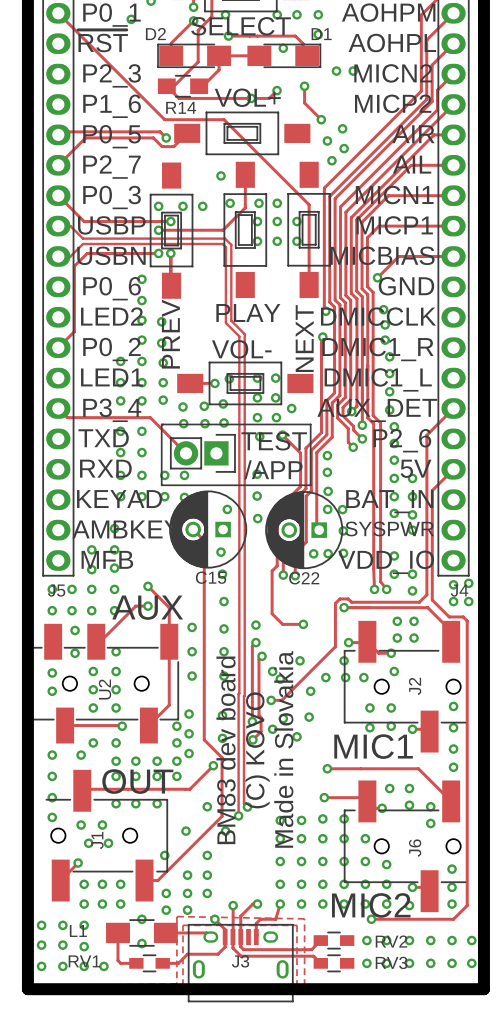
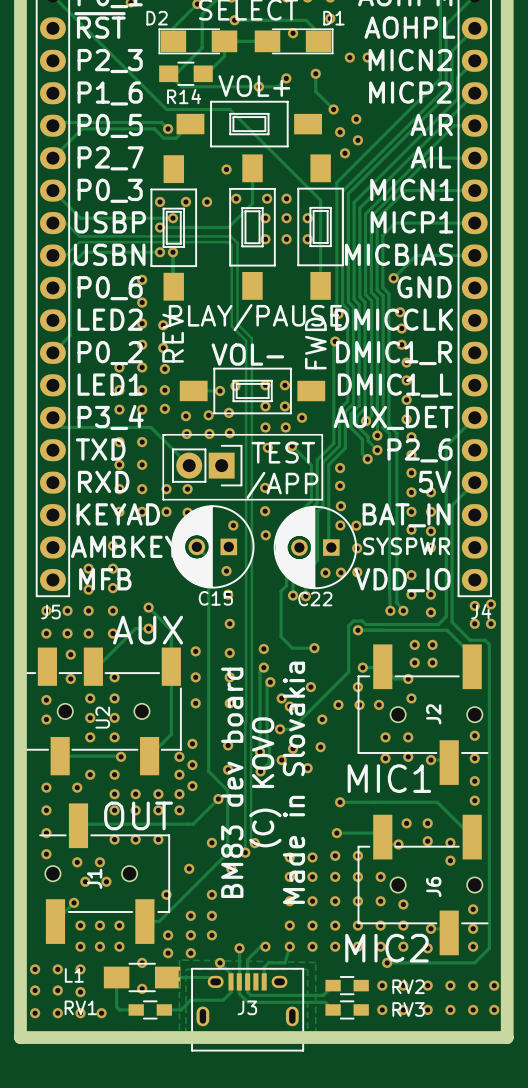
part value: PLAY (248, 312) -> PLAY/PAUSE (255, 317)
part value: PREV (170, 334) -> REV (173, 338)
part value: NEXT (304, 338) -> FWD (315, 343)

